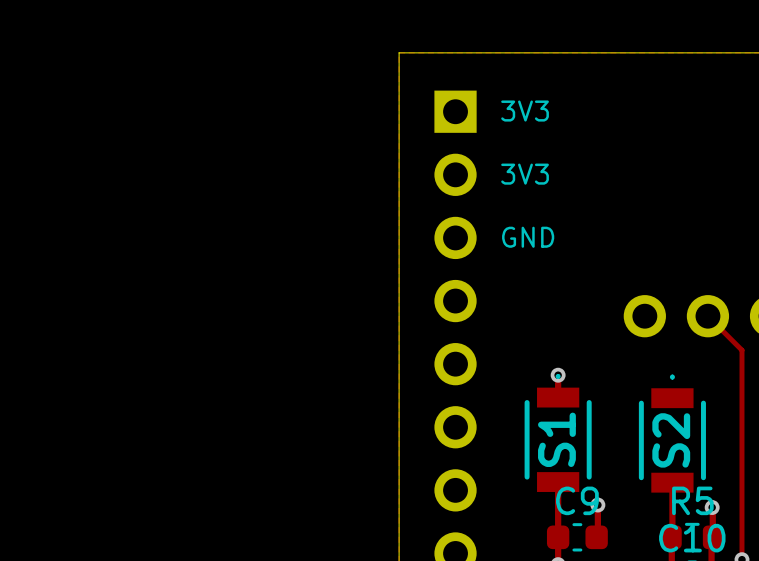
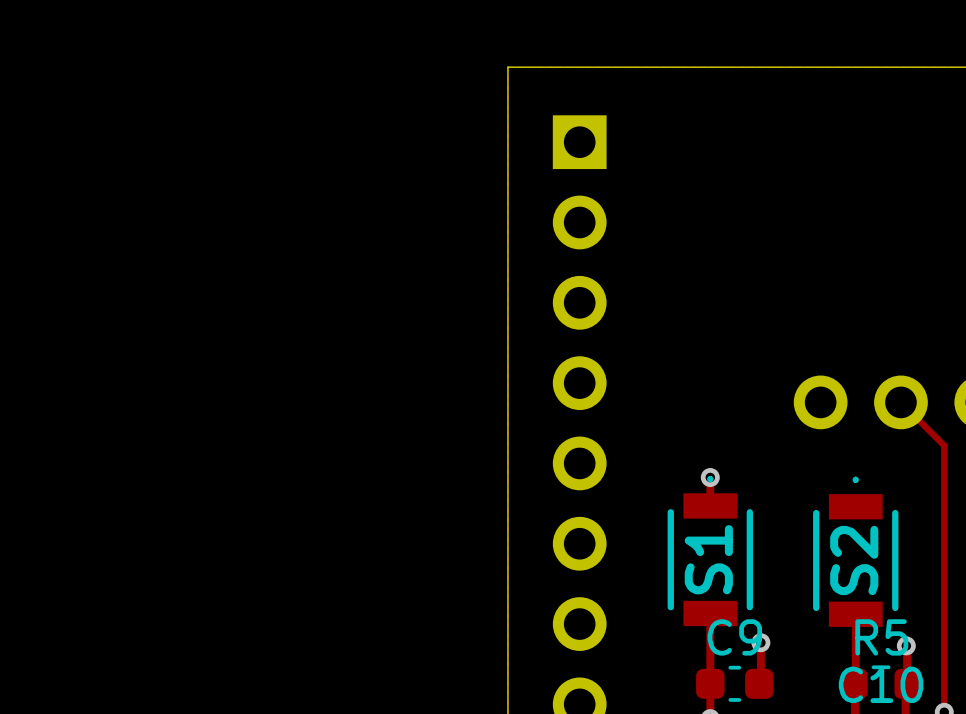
text: 3V3 (525, 111) -> none
text: 3V3 (525, 174) -> none
text: GND (528, 237) -> none

